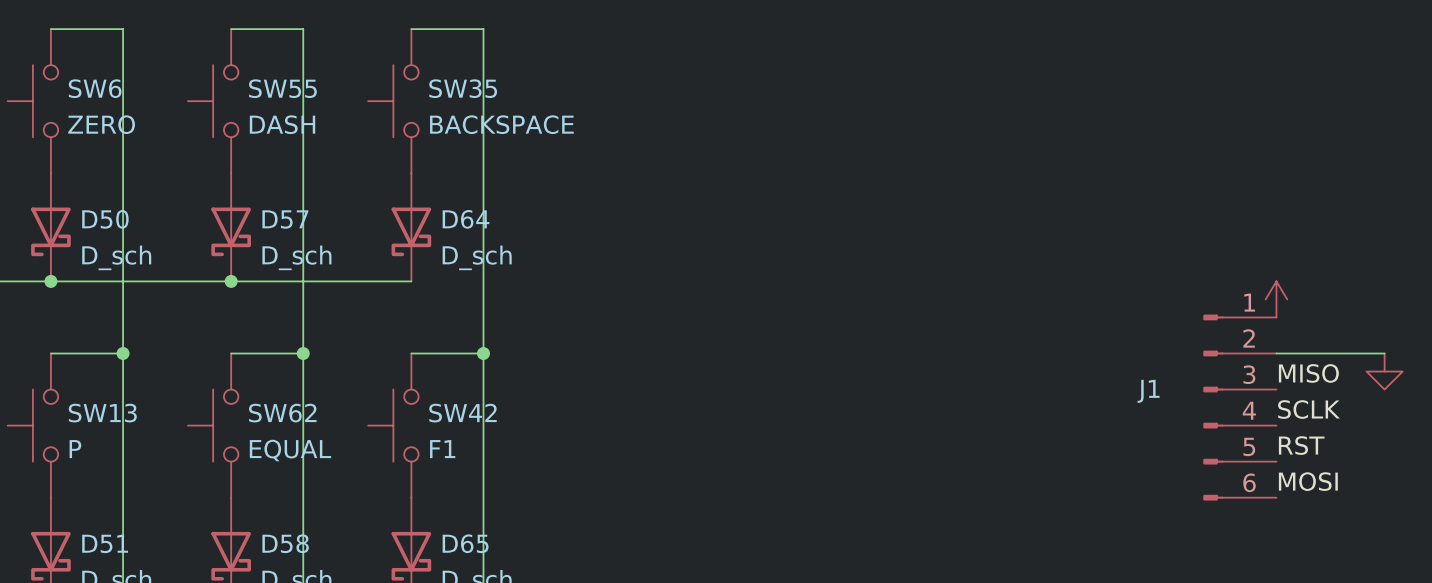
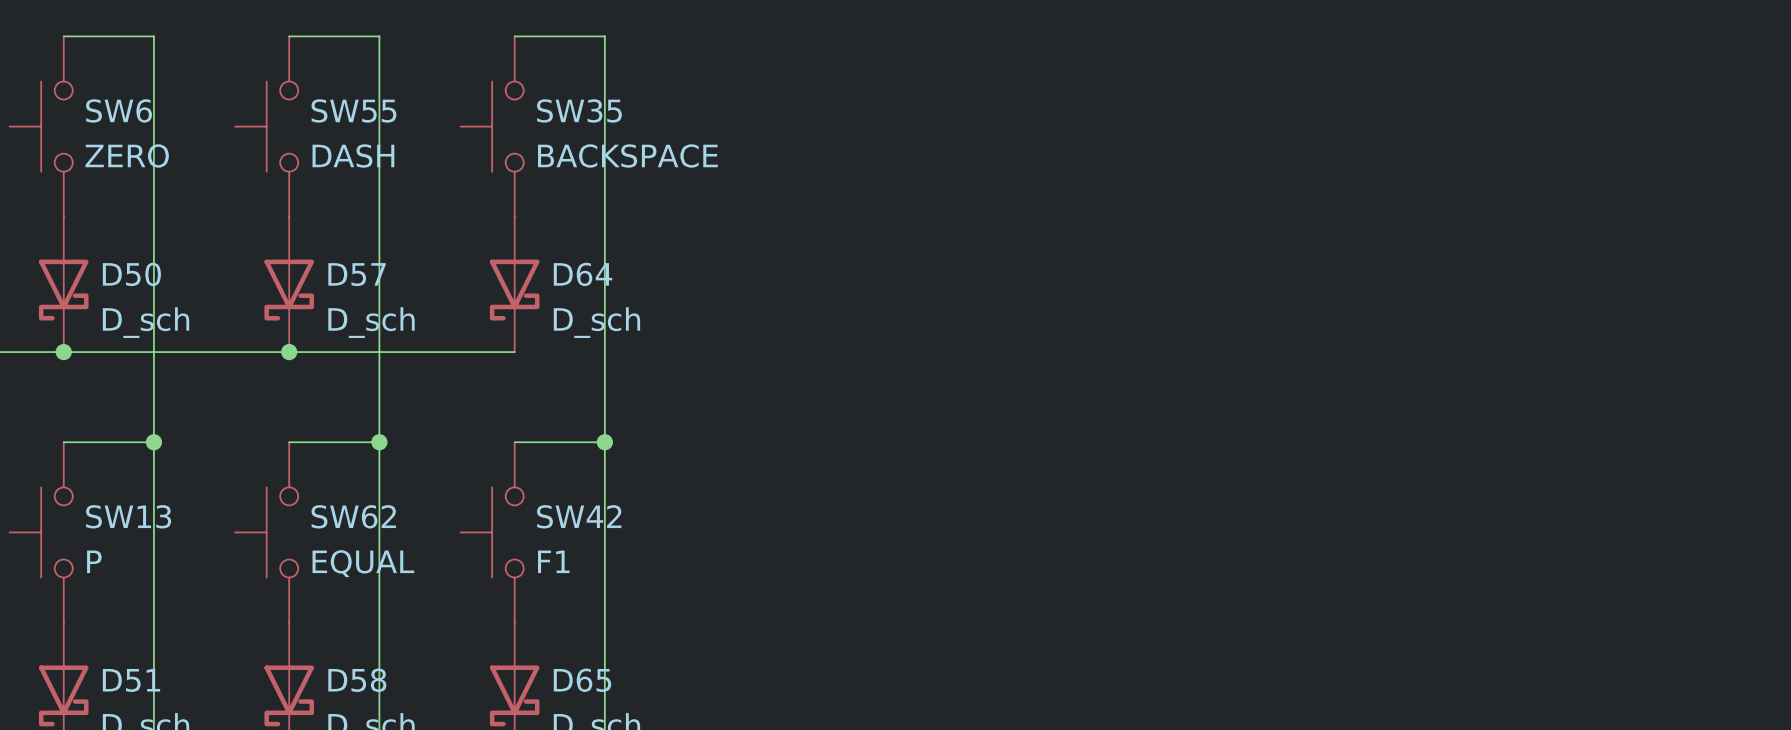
power symbol: (1276, 299) -> none
wire: (1276, 353) (1384, 353) -> none
power symbol: (1384, 371) -> none
label: MISO (1308, 373) -> none
J1: (1239, 407) -> none
label: SCLK (1309, 409) -> none
label: RST (1301, 445) -> none
label: MOSI (1308, 481) -> none

